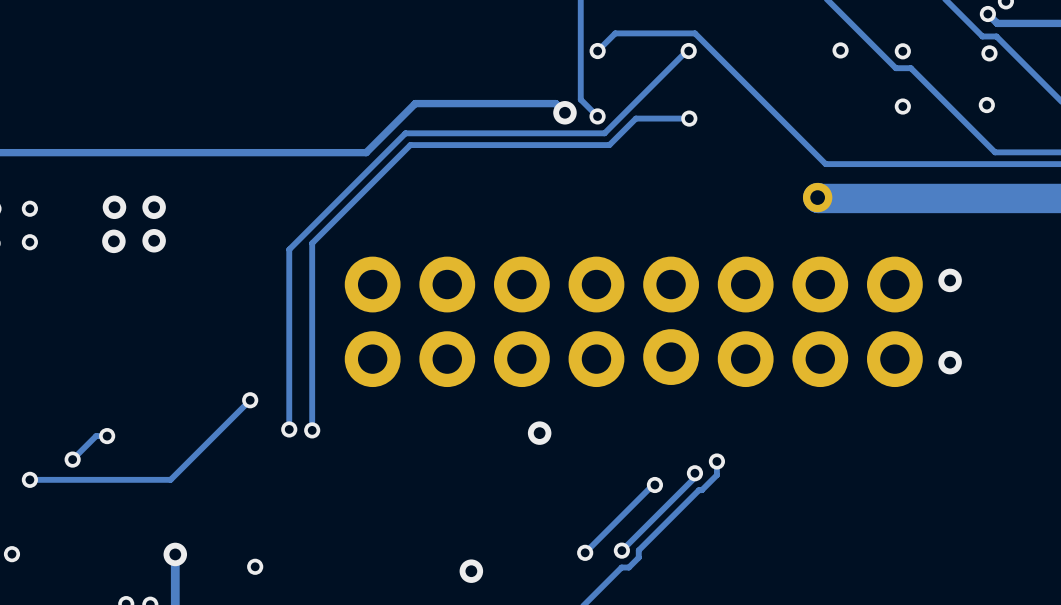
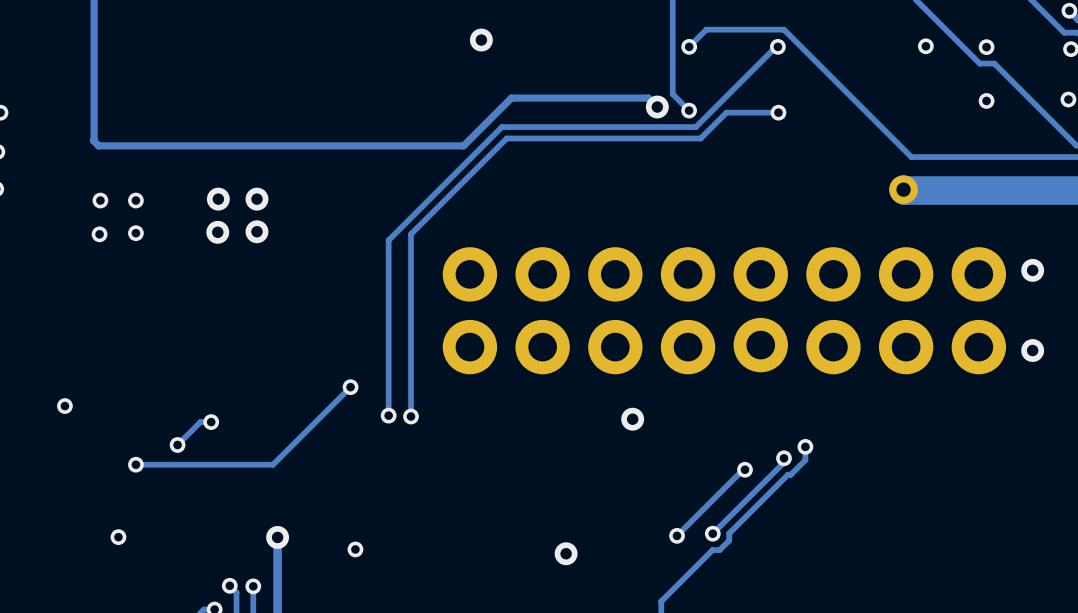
via: none -> (481, 40)

